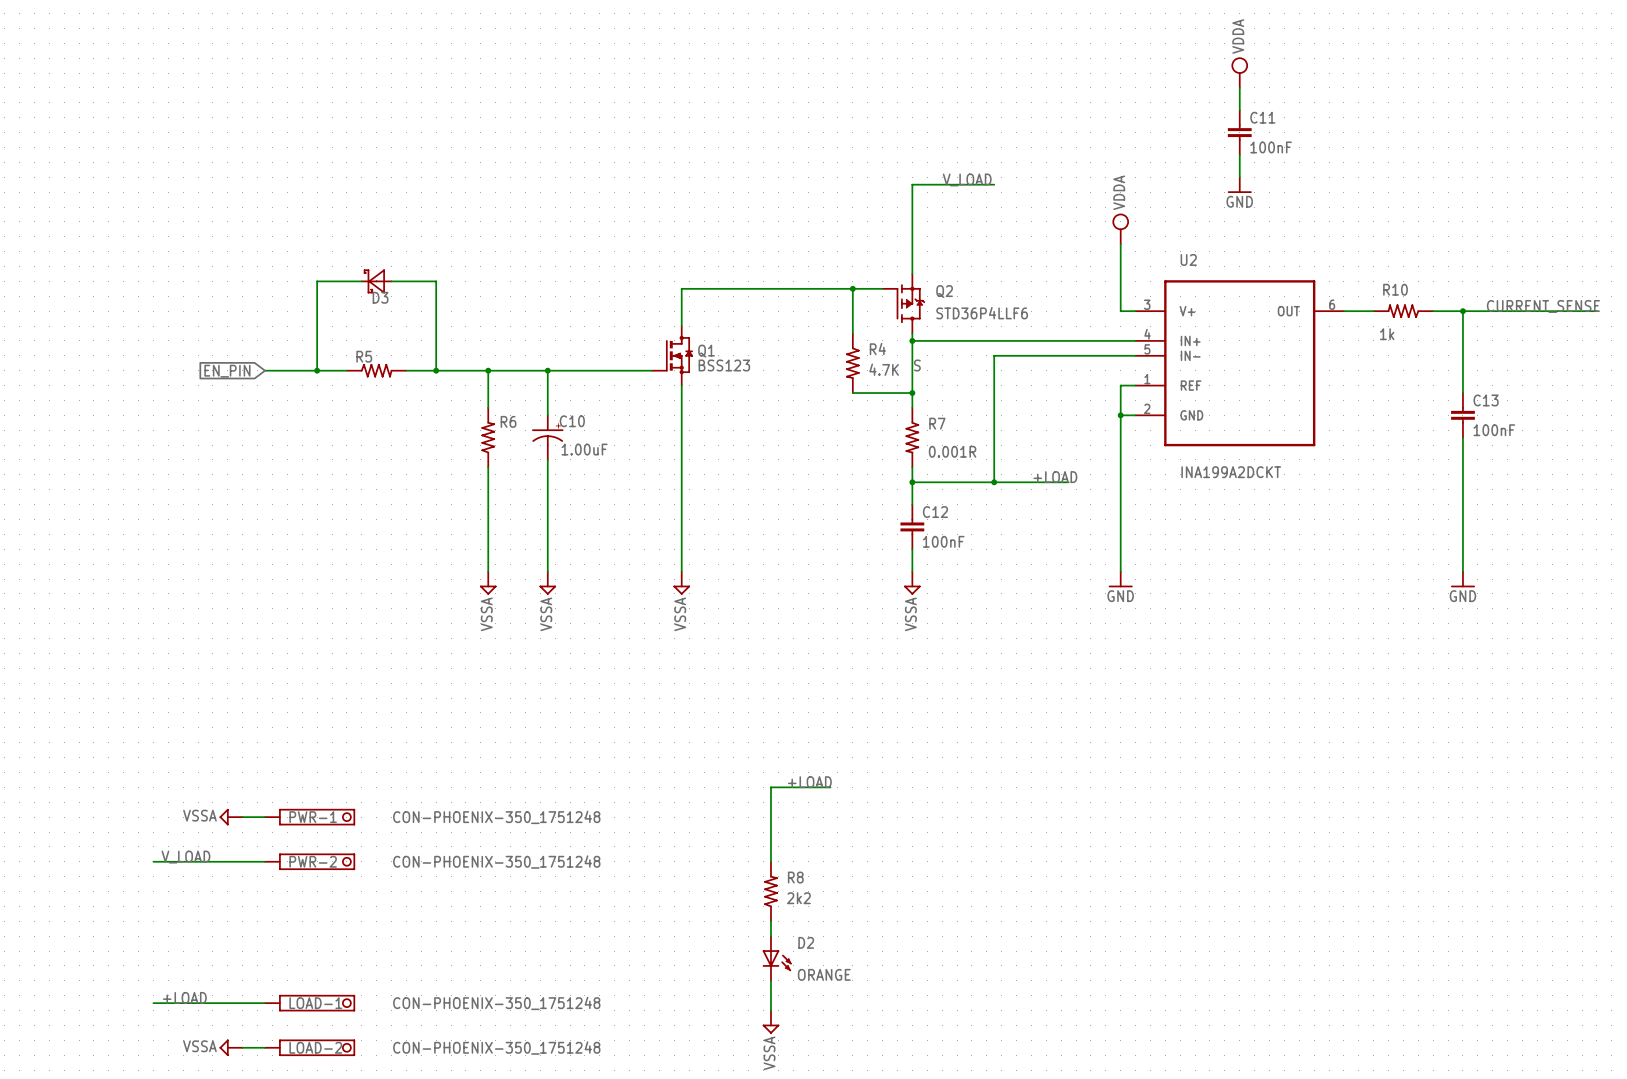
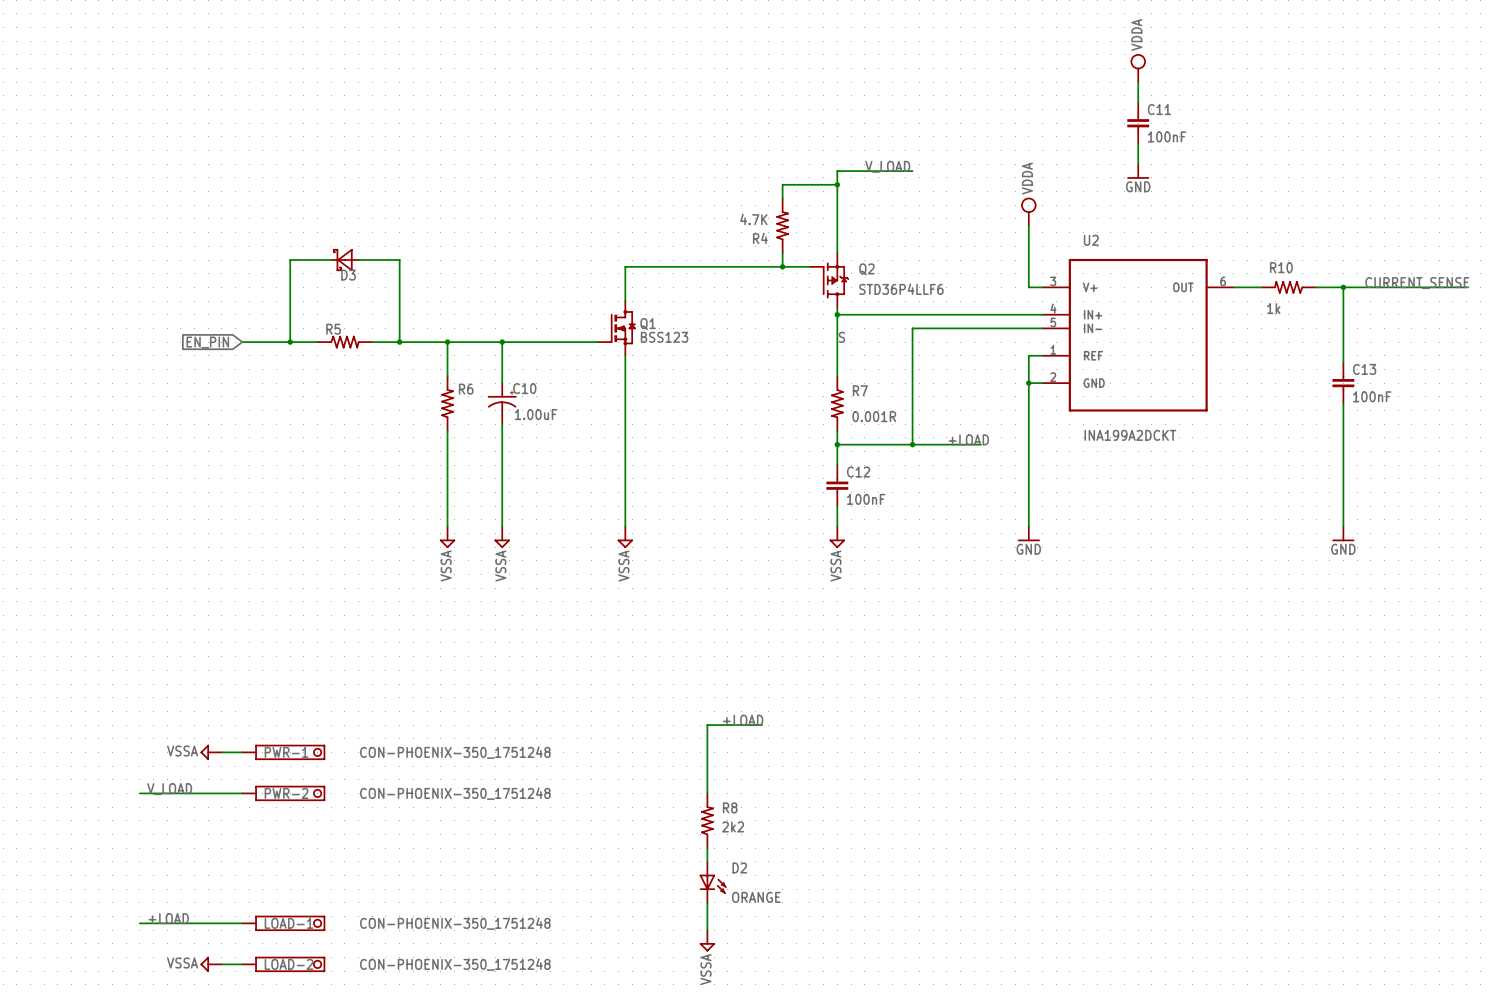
wire: none -> (837, 184) (782, 184) (782, 198)
junction: none -> (837, 184)
wire: (852, 288) (852, 333) -> (782, 266) (782, 253)
R4 rotation: 0° (852, 363) -> 180° (782, 225)
R4 position: (852, 363) -> (782, 225)
wire: (852, 393) (912, 393) -> none
junction: (912, 393) -> none

